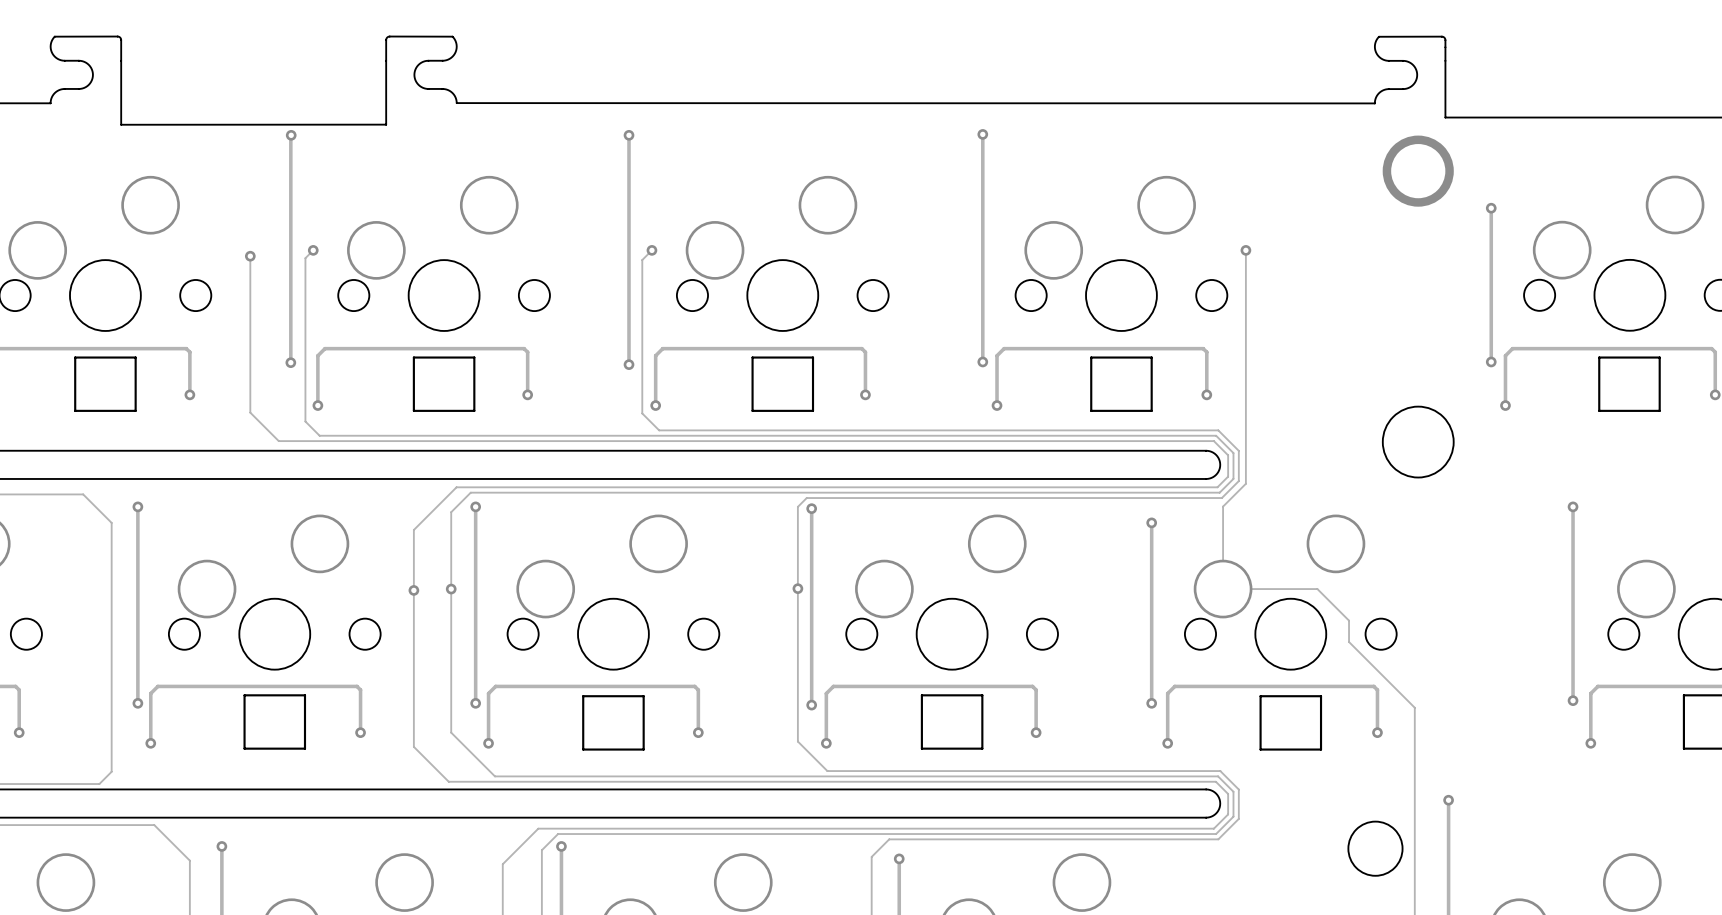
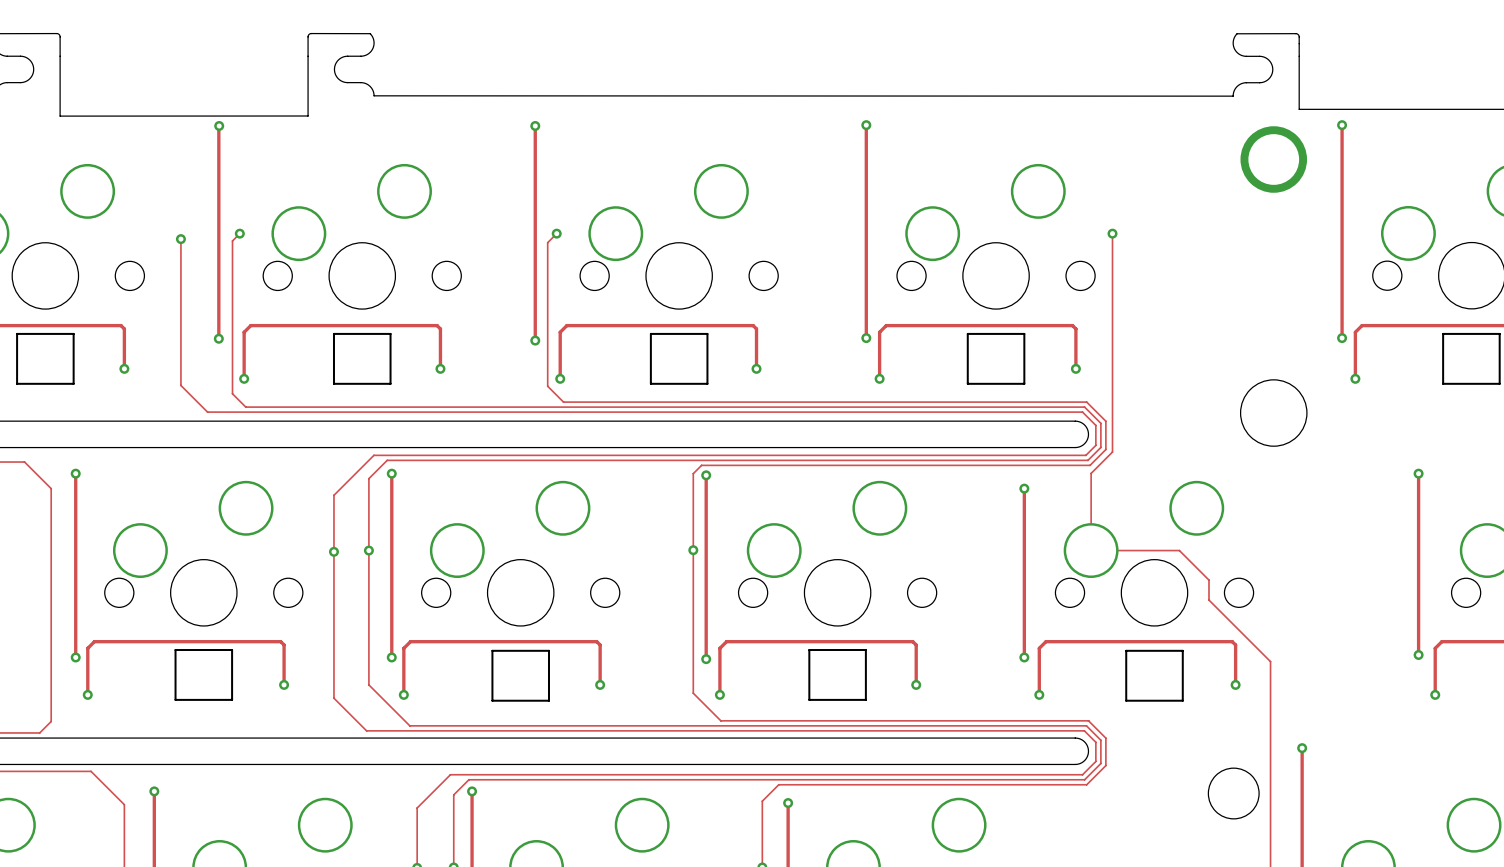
track: none -> (1342, 125) (1342, 194)
via position: (1491, 208) -> (1342, 125)

